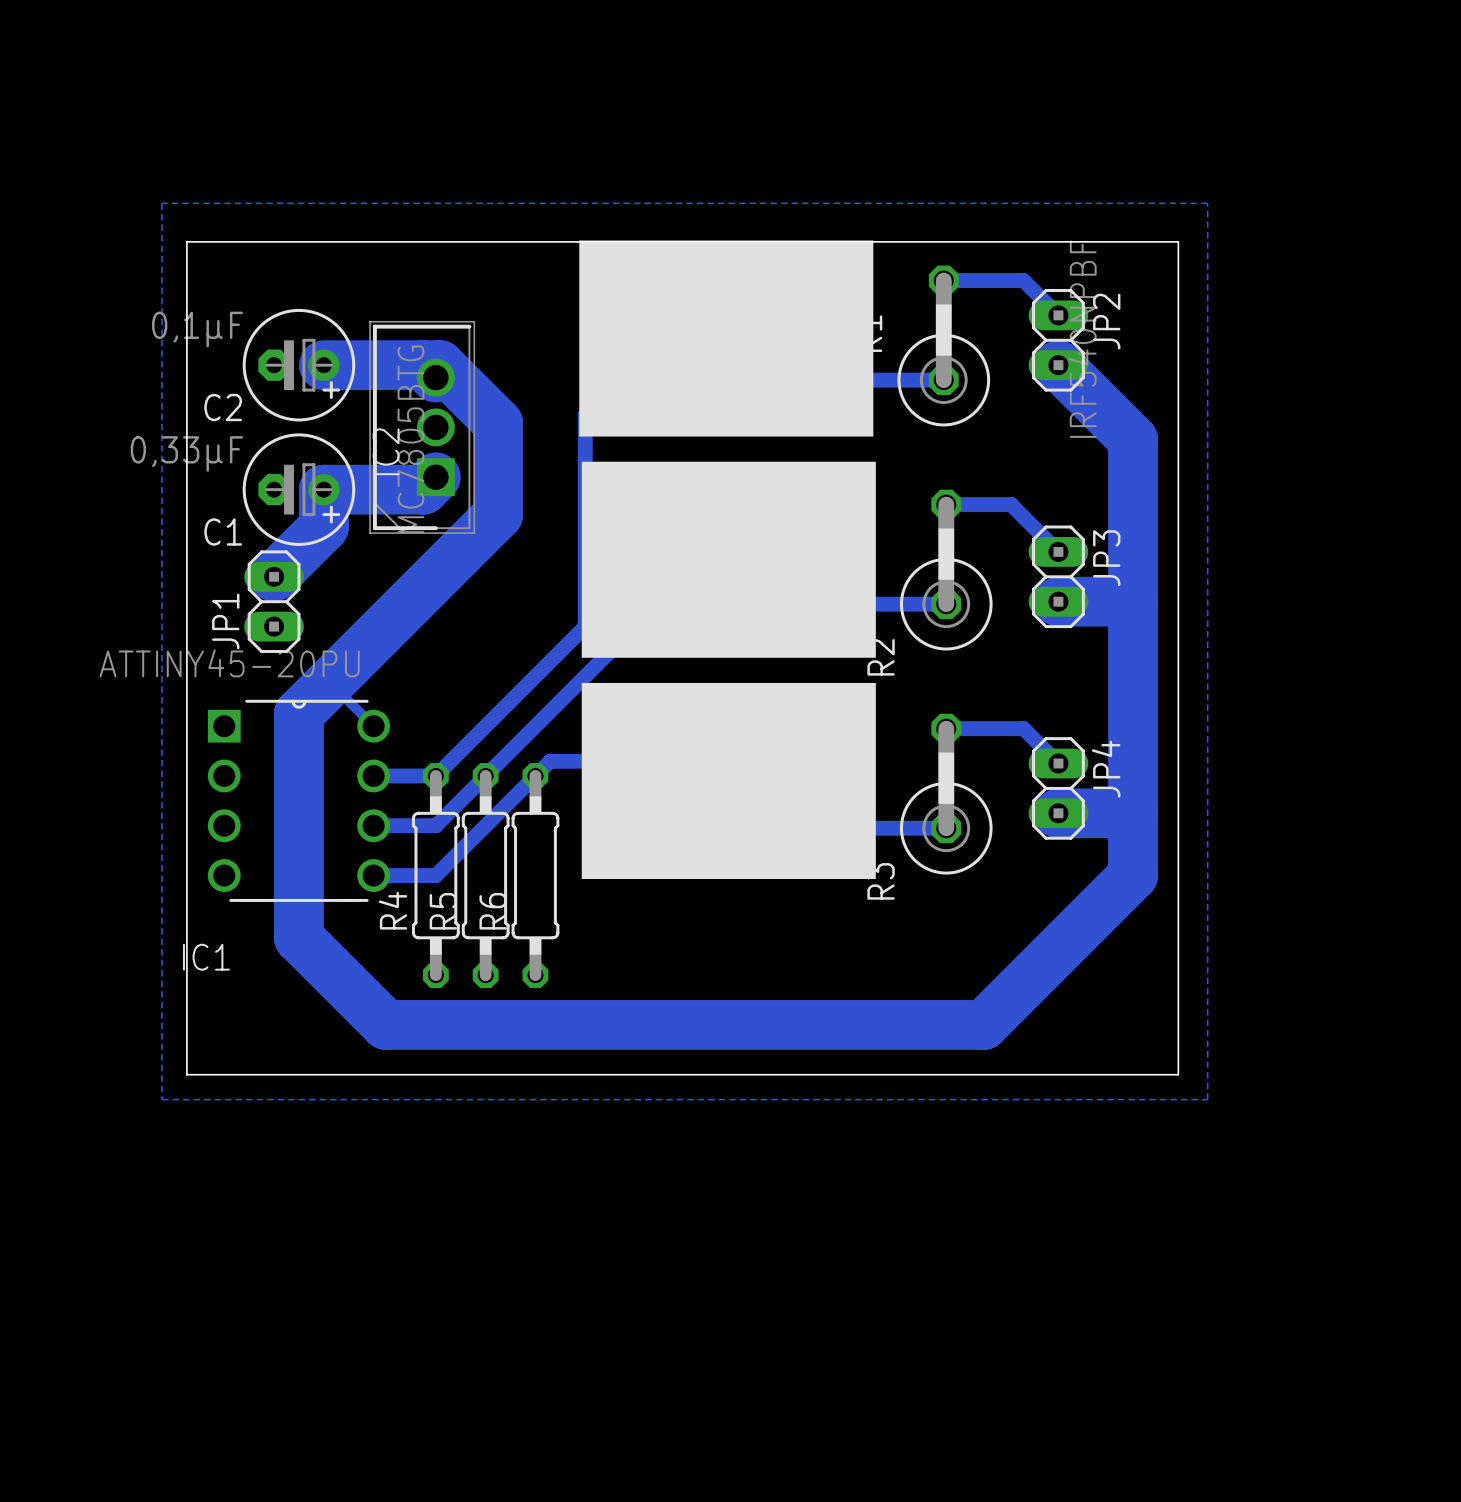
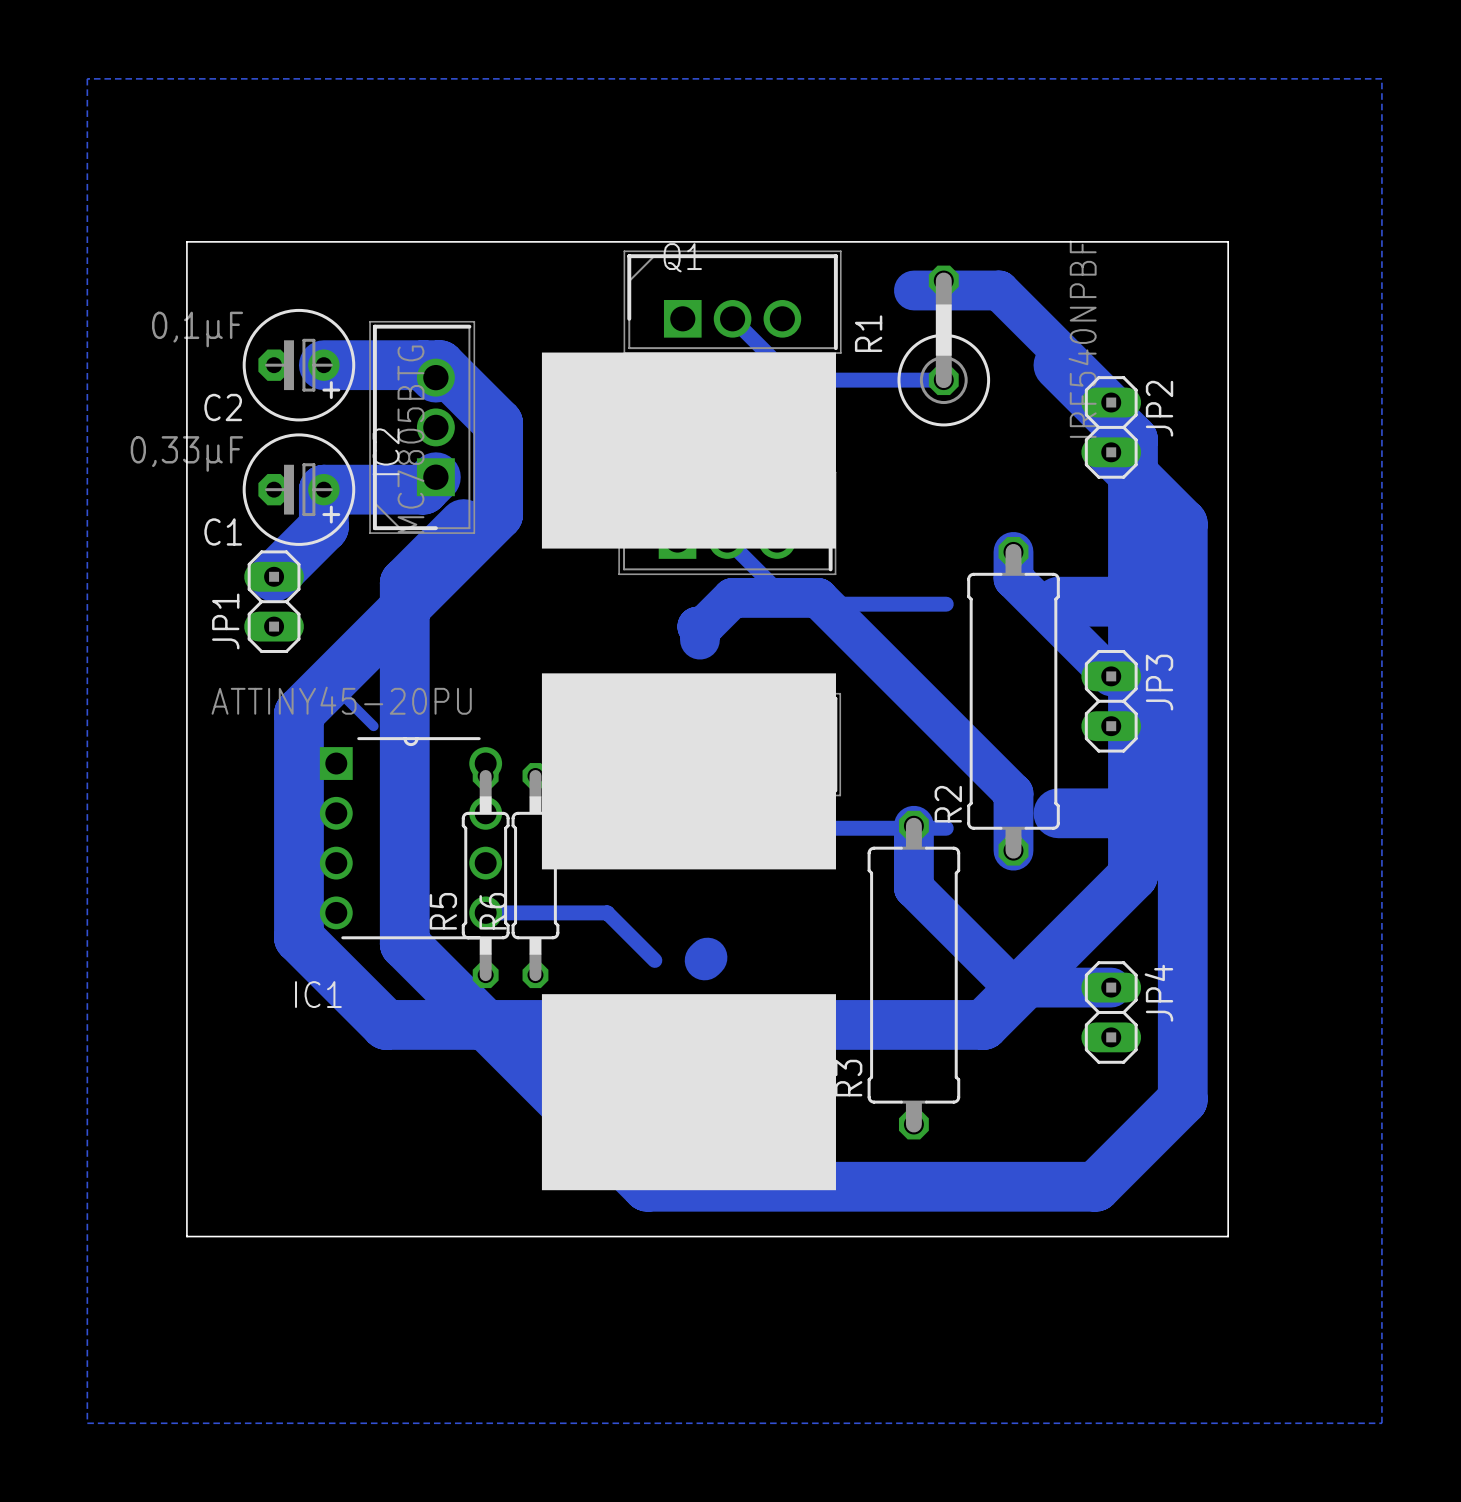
bottom zone outline: (162, 203) (1207, 203) (1207, 1099) (162, 1099) (162, 203) -> (87, 78) (87, 1423) (1381, 1423) (1381, 78) (87, 78)
drawing: [579, 240, 874, 437] -> none
board edge: (1178, 241) (1178, 1074) (186, 1074) -> (1178, 241) (1228, 241) (1228, 1236) (186, 1236) (186, 1074)
bottom track: (943, 280) (1023, 280) (1058, 315) -> none
bottom track: none -> (913, 290) (999, 290) (1111, 402)
bottom track: (682, 318) (585, 414) (585, 626) (435, 775) (373, 775) -> none
JP2 position: (1058, 340) -> (1111, 427)
drawing: none -> [541, 352, 836, 549]
bottom track: none -> (1111, 452) (1182, 523) (1182, 1099) (1095, 1186) (647, 1186) (404, 944) (404, 583) (463, 524)
drawing: [581, 461, 876, 658] -> none
R2 footprint: [899, 489, 993, 651] -> [967, 536, 1060, 866]
bottom track: (946, 504) (1011, 504) (1058, 551) -> none
bottom track: (677, 540) (677, 584) (435, 825) (373, 825) -> none
bottom track: none -> (1013, 551) (1013, 578) (1111, 676)
JP3 position: (1058, 576) -> (1111, 701)
bottom track: none -> (699, 639) (699, 629) (697, 626) (703, 626) (732, 597) (817, 597) (1013, 793) (1013, 850)
R3 footprint: [899, 713, 993, 875] -> [867, 810, 961, 1140]
bottom track: (946, 728) (1023, 728) (1058, 763) -> none
bottom track: (682, 761) (550, 761) (435, 875) (373, 875) -> none
drawing position: (728, 780) -> (688, 771)
JP4 position: (1058, 788) -> (1111, 1012)
IC1 position: (298, 800) -> (410, 838)
bottom track: none -> (913, 825) (913, 888) (1013, 987) (1111, 987)
R4: (435, 875) -> none
bottom track: none -> (485, 912) (607, 912) (654, 960)
bottom track: none -> (707, 957) (704, 960)
drawing: none -> [541, 994, 836, 1191]

